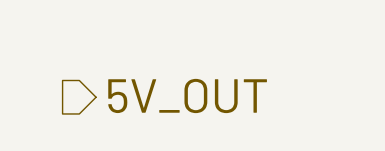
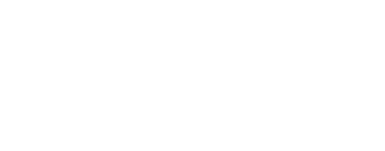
hierarchical label: 5V_OUT (187, 95) -> none

